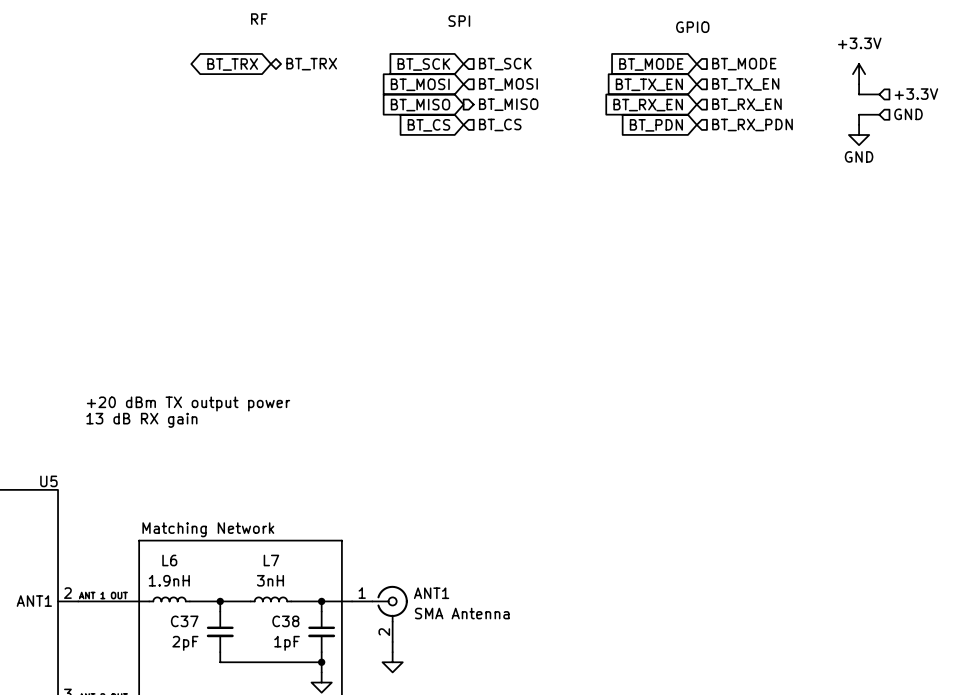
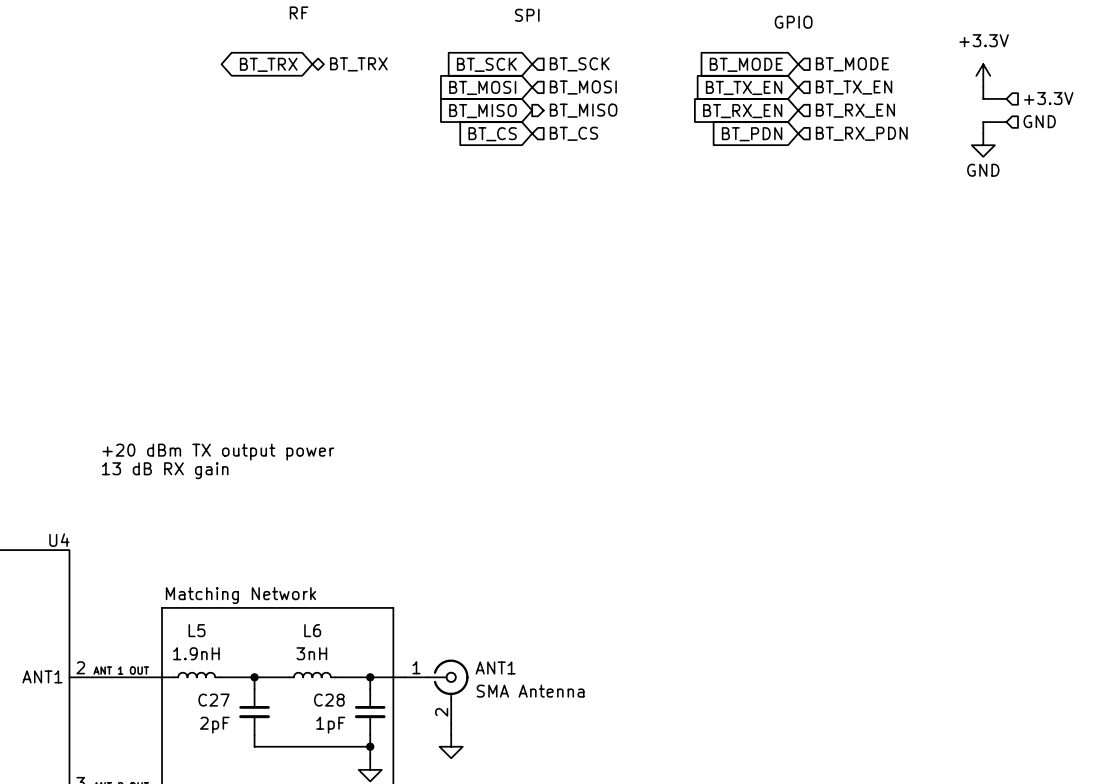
U5 name: U5 (48, 481) -> U4 (59, 540)
L6 name: L6 (169, 560) -> L5 (196, 630)
L7 name: L7 (271, 560) -> L6 (312, 630)
C37 name: C37 (184, 621) -> C27 (213, 700)
C38 name: C38 (285, 621) -> C28 (329, 700)

